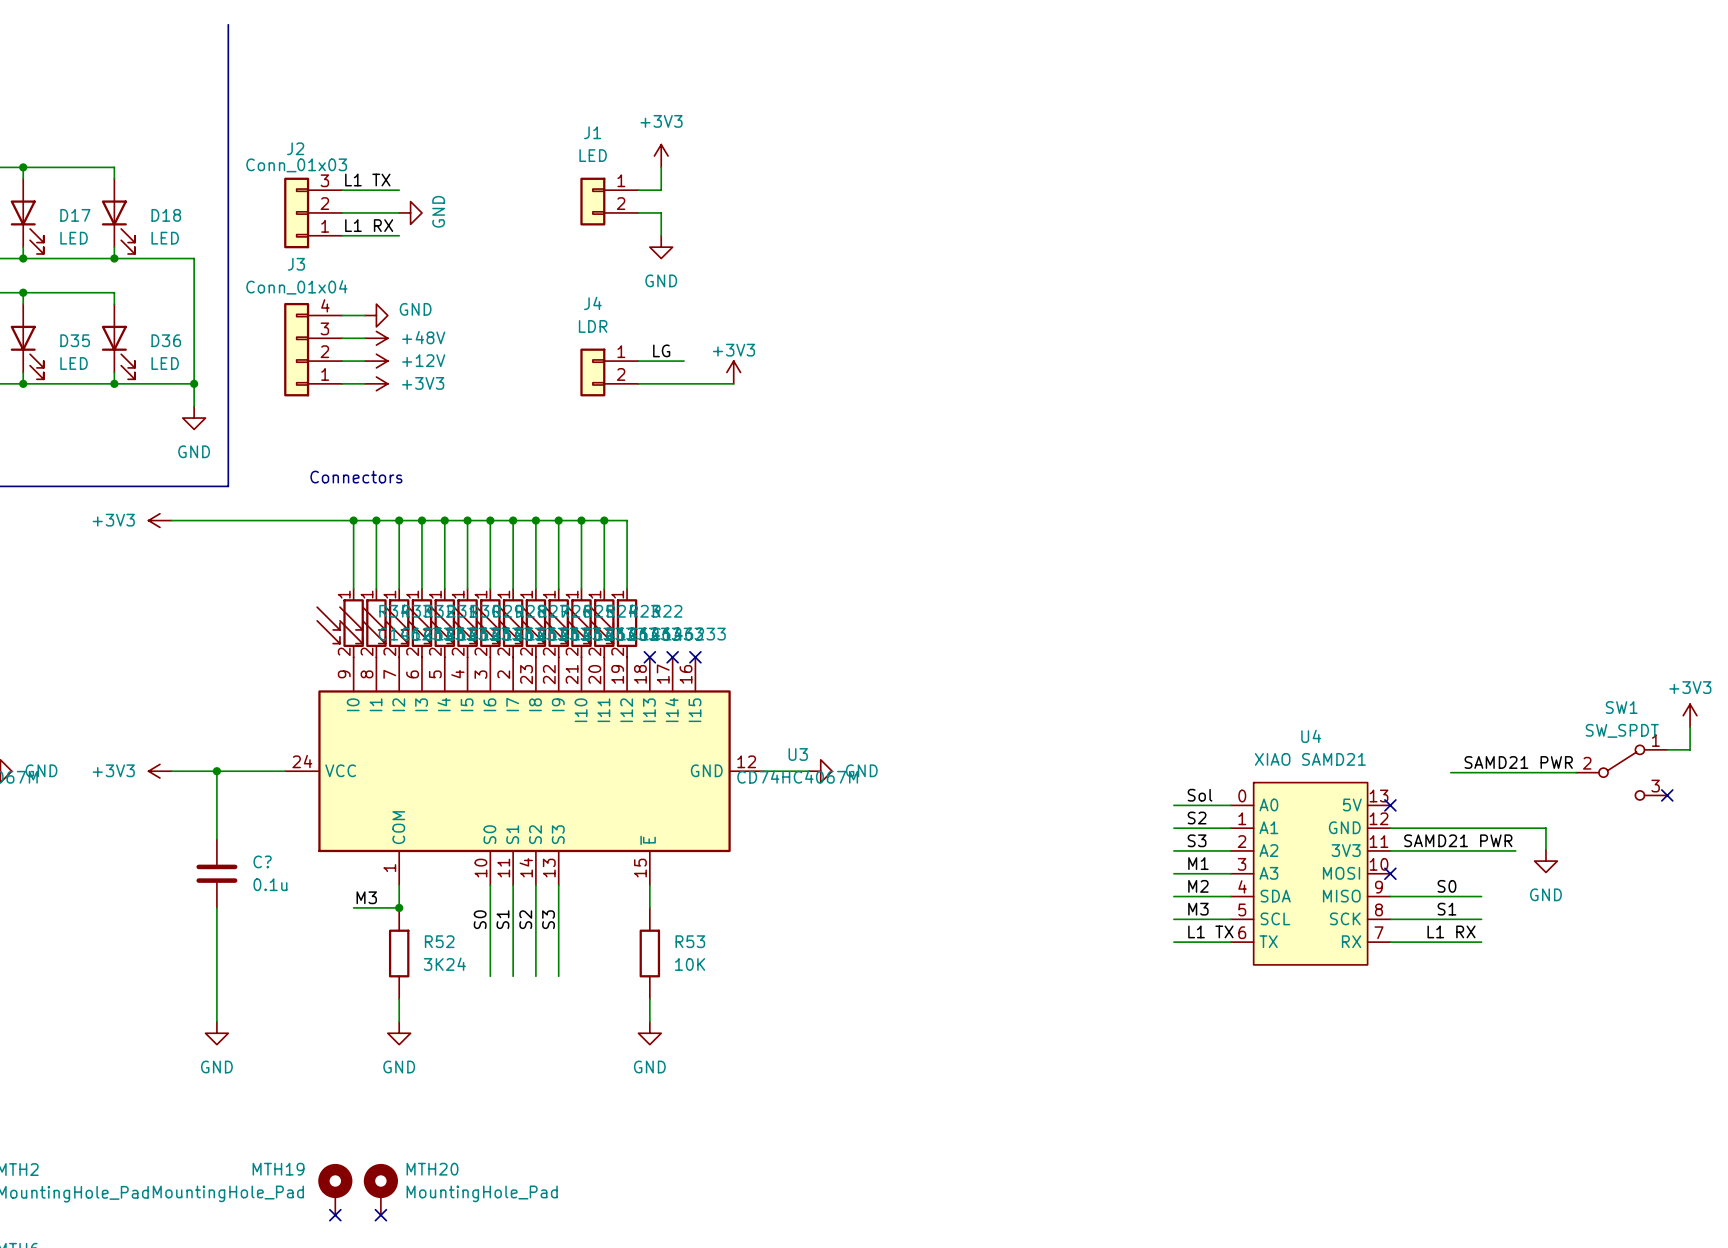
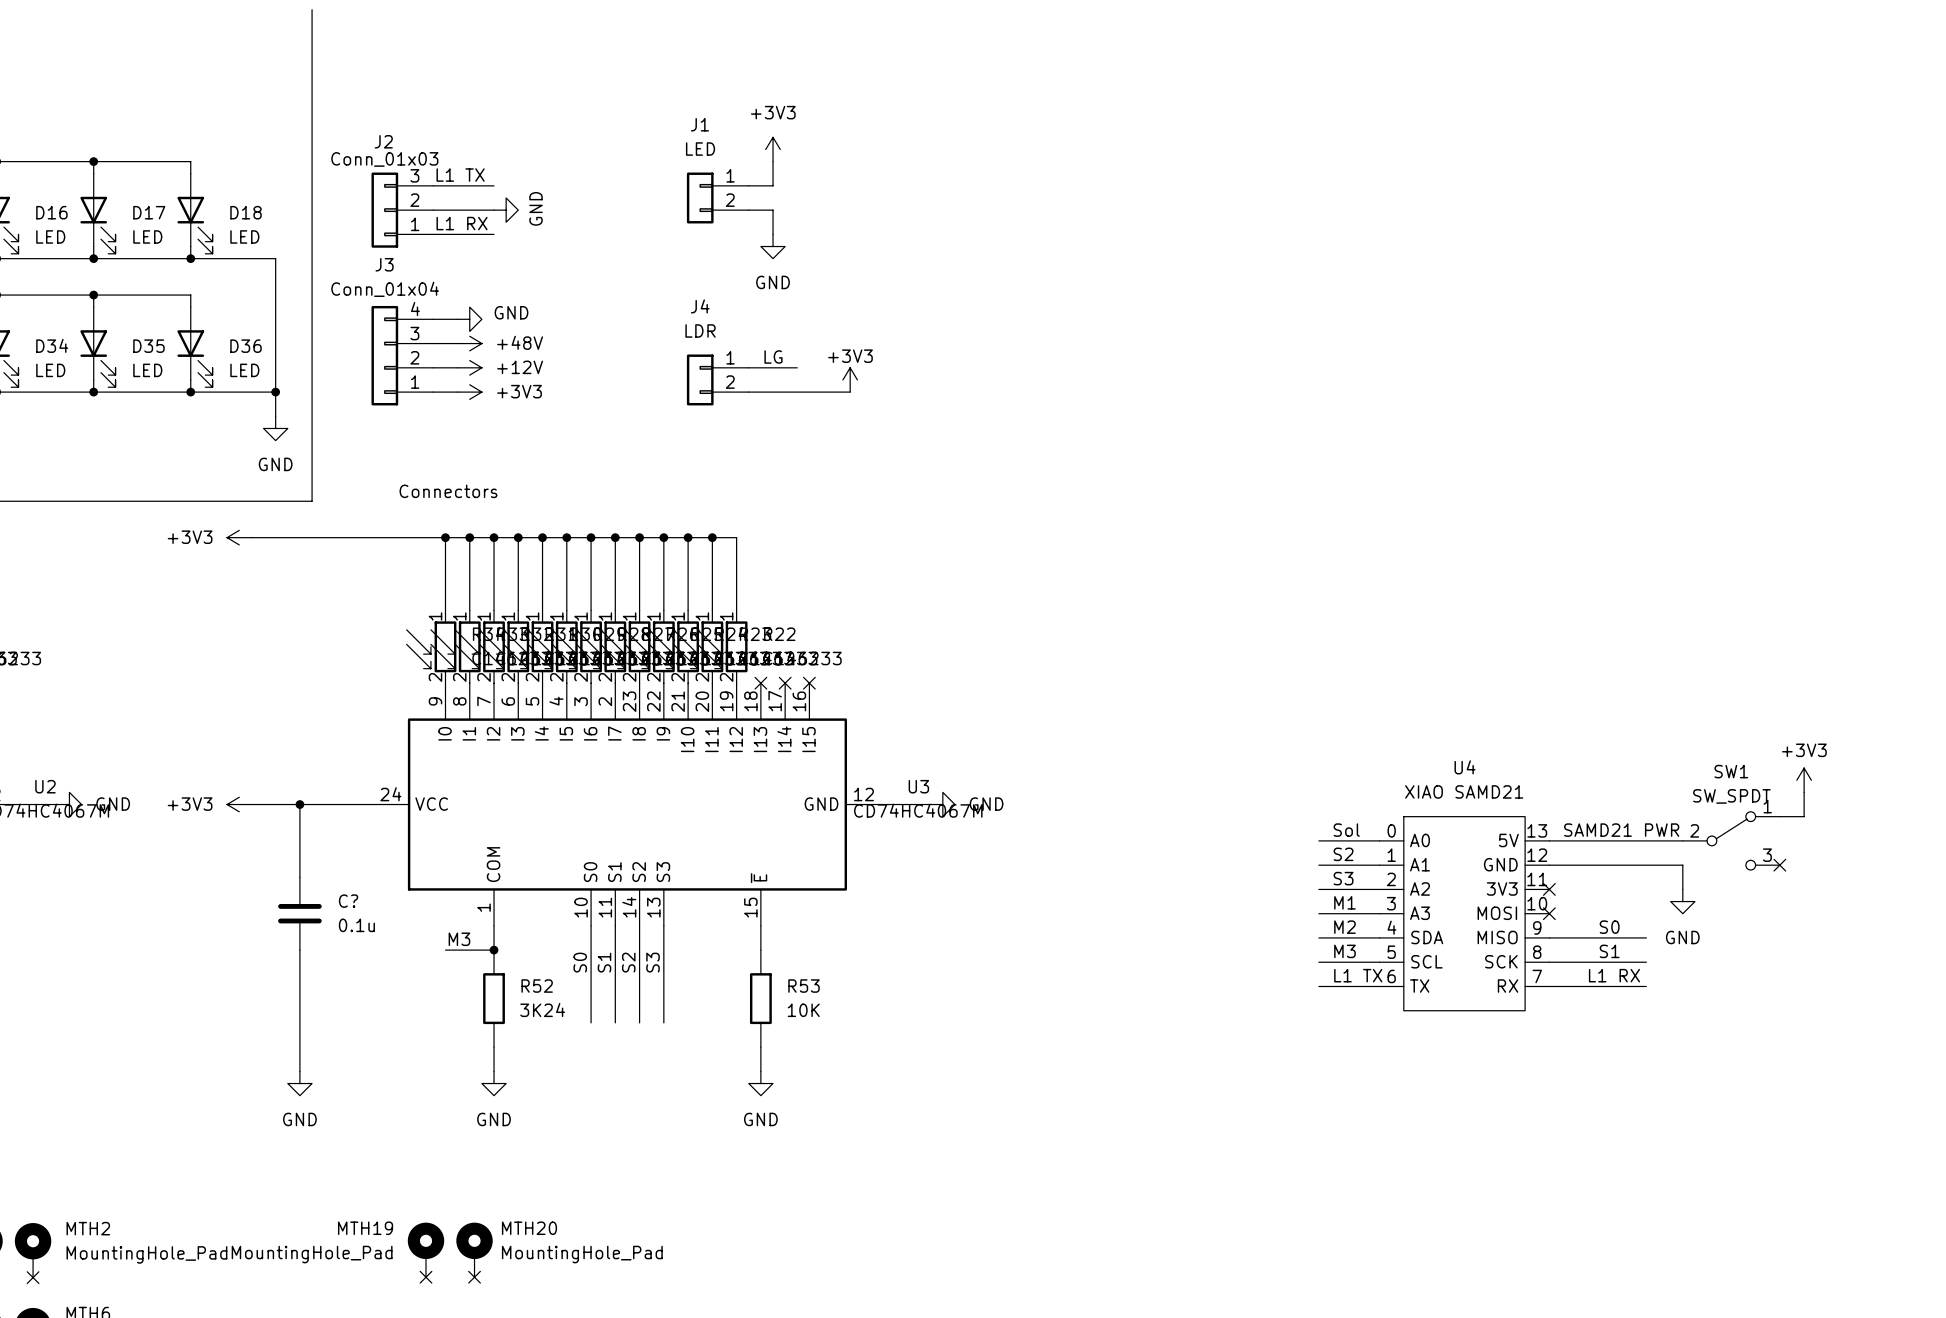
power symbol position: +3V3 (1690, 715) -> +3V3 (1804, 780)
wire: (1690, 727) (1690, 749) (1667, 749) -> (1804, 792) (1804, 816) (1779, 816)
label: SAMD21 PWR (1518, 762) -> none
wire: (1450, 772) (1576, 772) -> (1549, 840) (1682, 840)
SW1 position: (1621, 772) -> (1731, 840)
label: none -> SAMD21 PWR (1621, 830)
no-connect mark: (1667, 795) -> none
no-connect mark position: (1390, 805) -> (1549, 889)
wire: (1515, 828) (1545, 828) (1545, 849) -> (1682, 865) (1682, 889)
no-connect mark: none -> (1779, 865)
label: SAMD21 PWR (1458, 840) -> none
wire: (1390, 850) (1515, 850) -> none
power symbol position: GND (1545, 861) -> GND (1682, 901)

